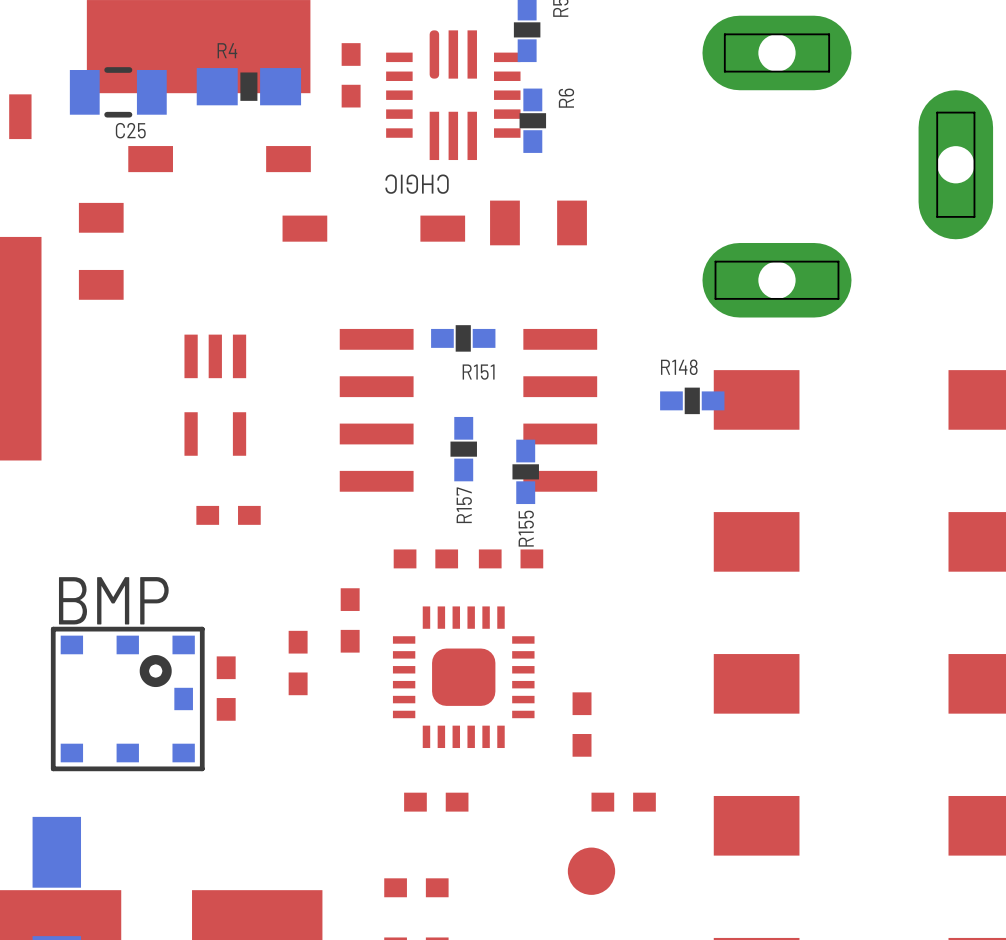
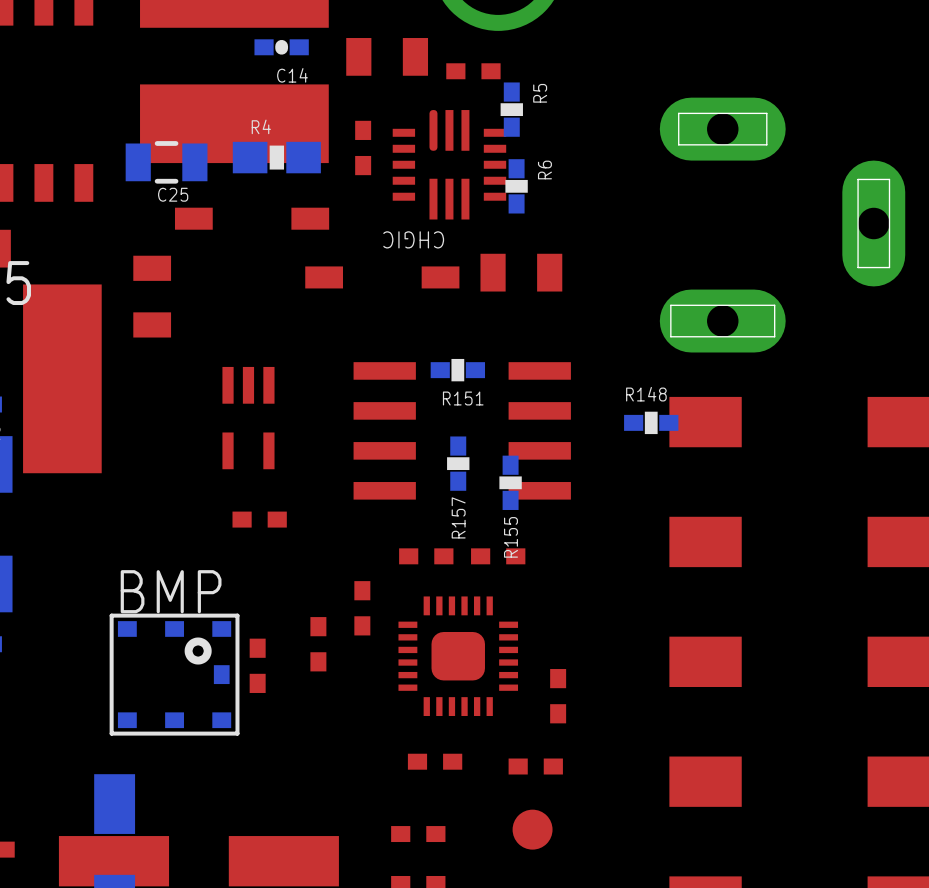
part position: (623, 802) -> (535, 766)
part position: (591, 871) -> (532, 829)

